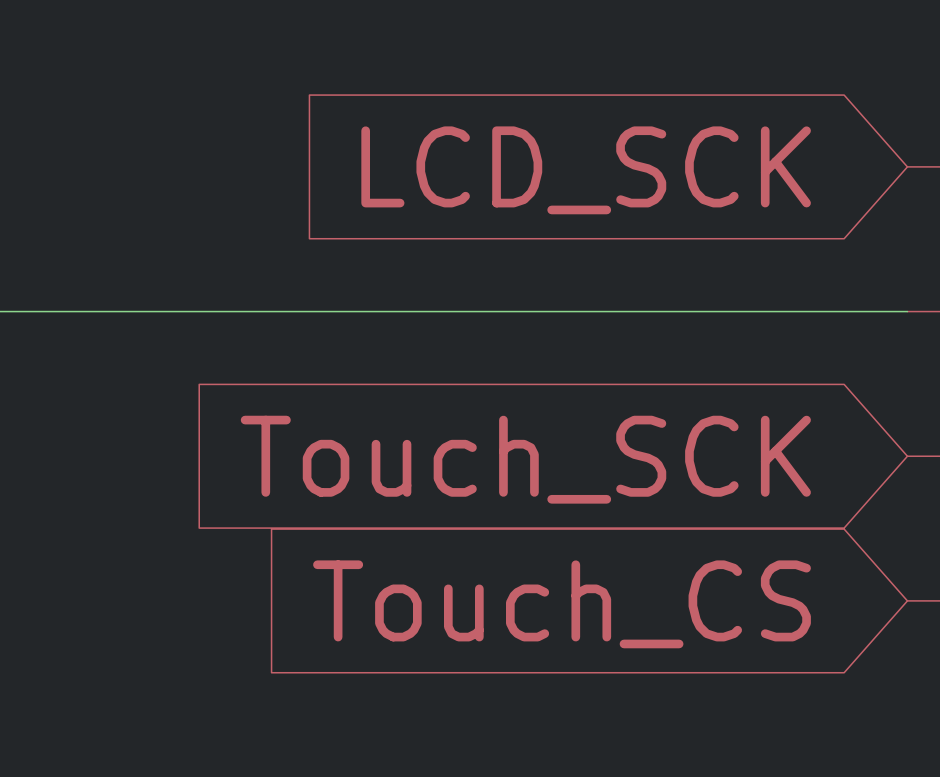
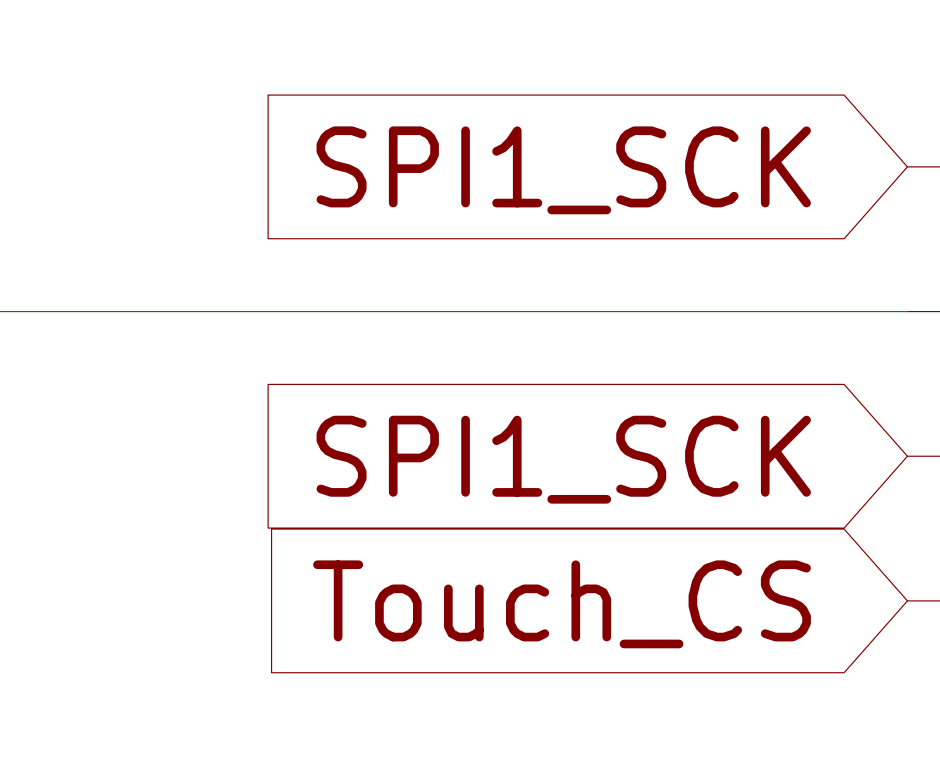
global label: LCD_SCK (586, 170) -> SPI1_SCK (563, 170)
global label: Touch_SCK (525, 459) -> SPI1_SCK (563, 459)

